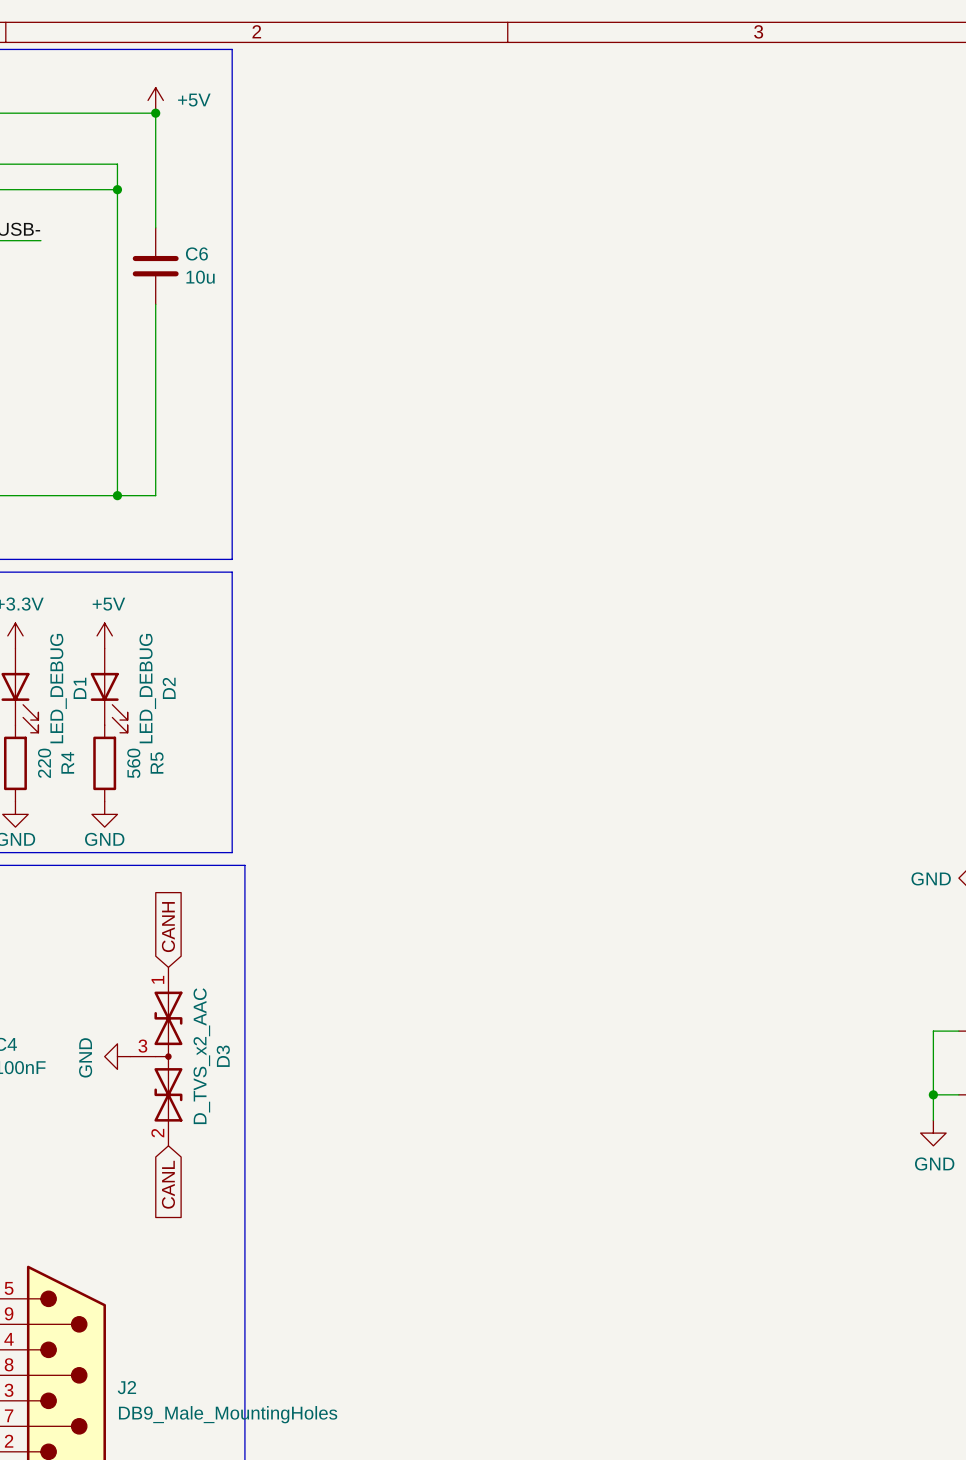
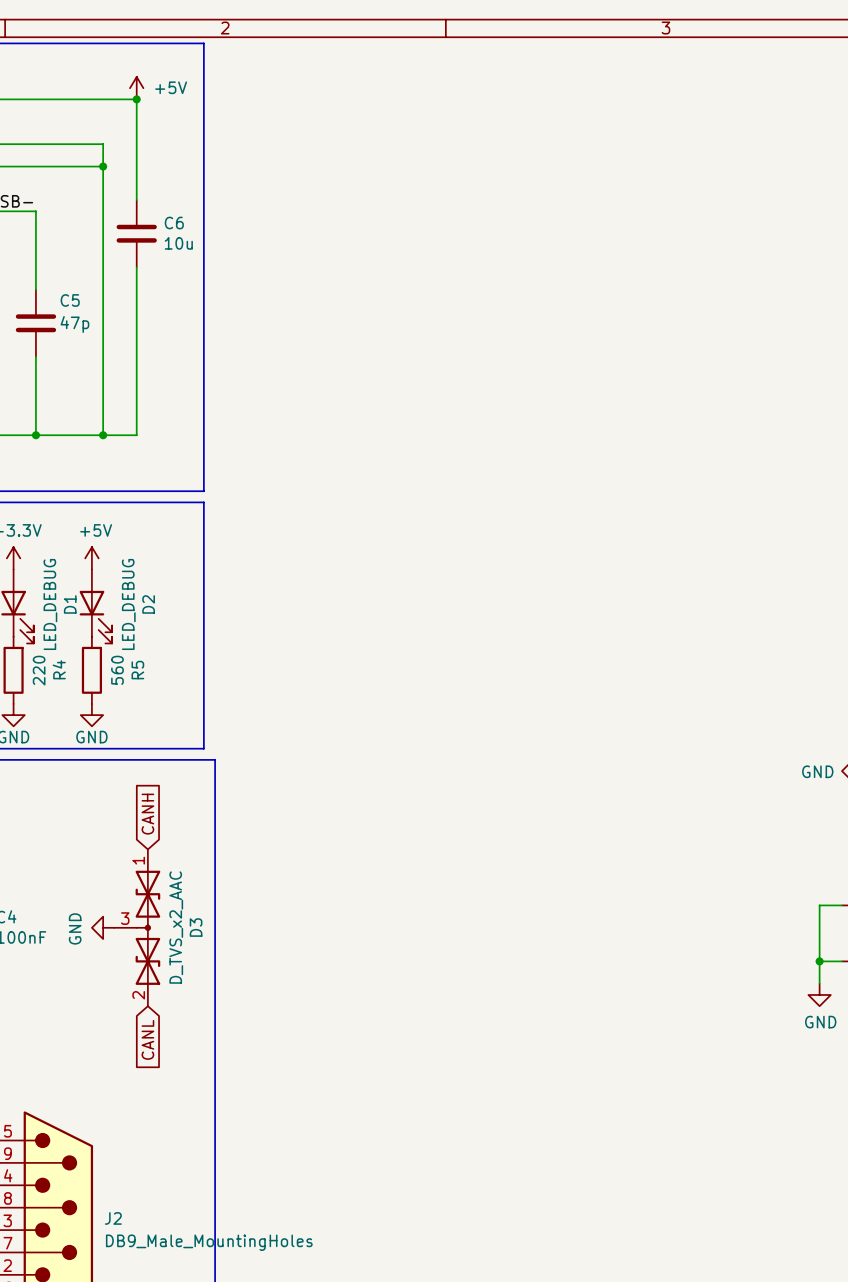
wire: none -> (35, 211) (35, 289)
C5: none -> 47p (35, 323)
wire: none -> (35, 356) (35, 435)
junction: none -> (35, 435)

